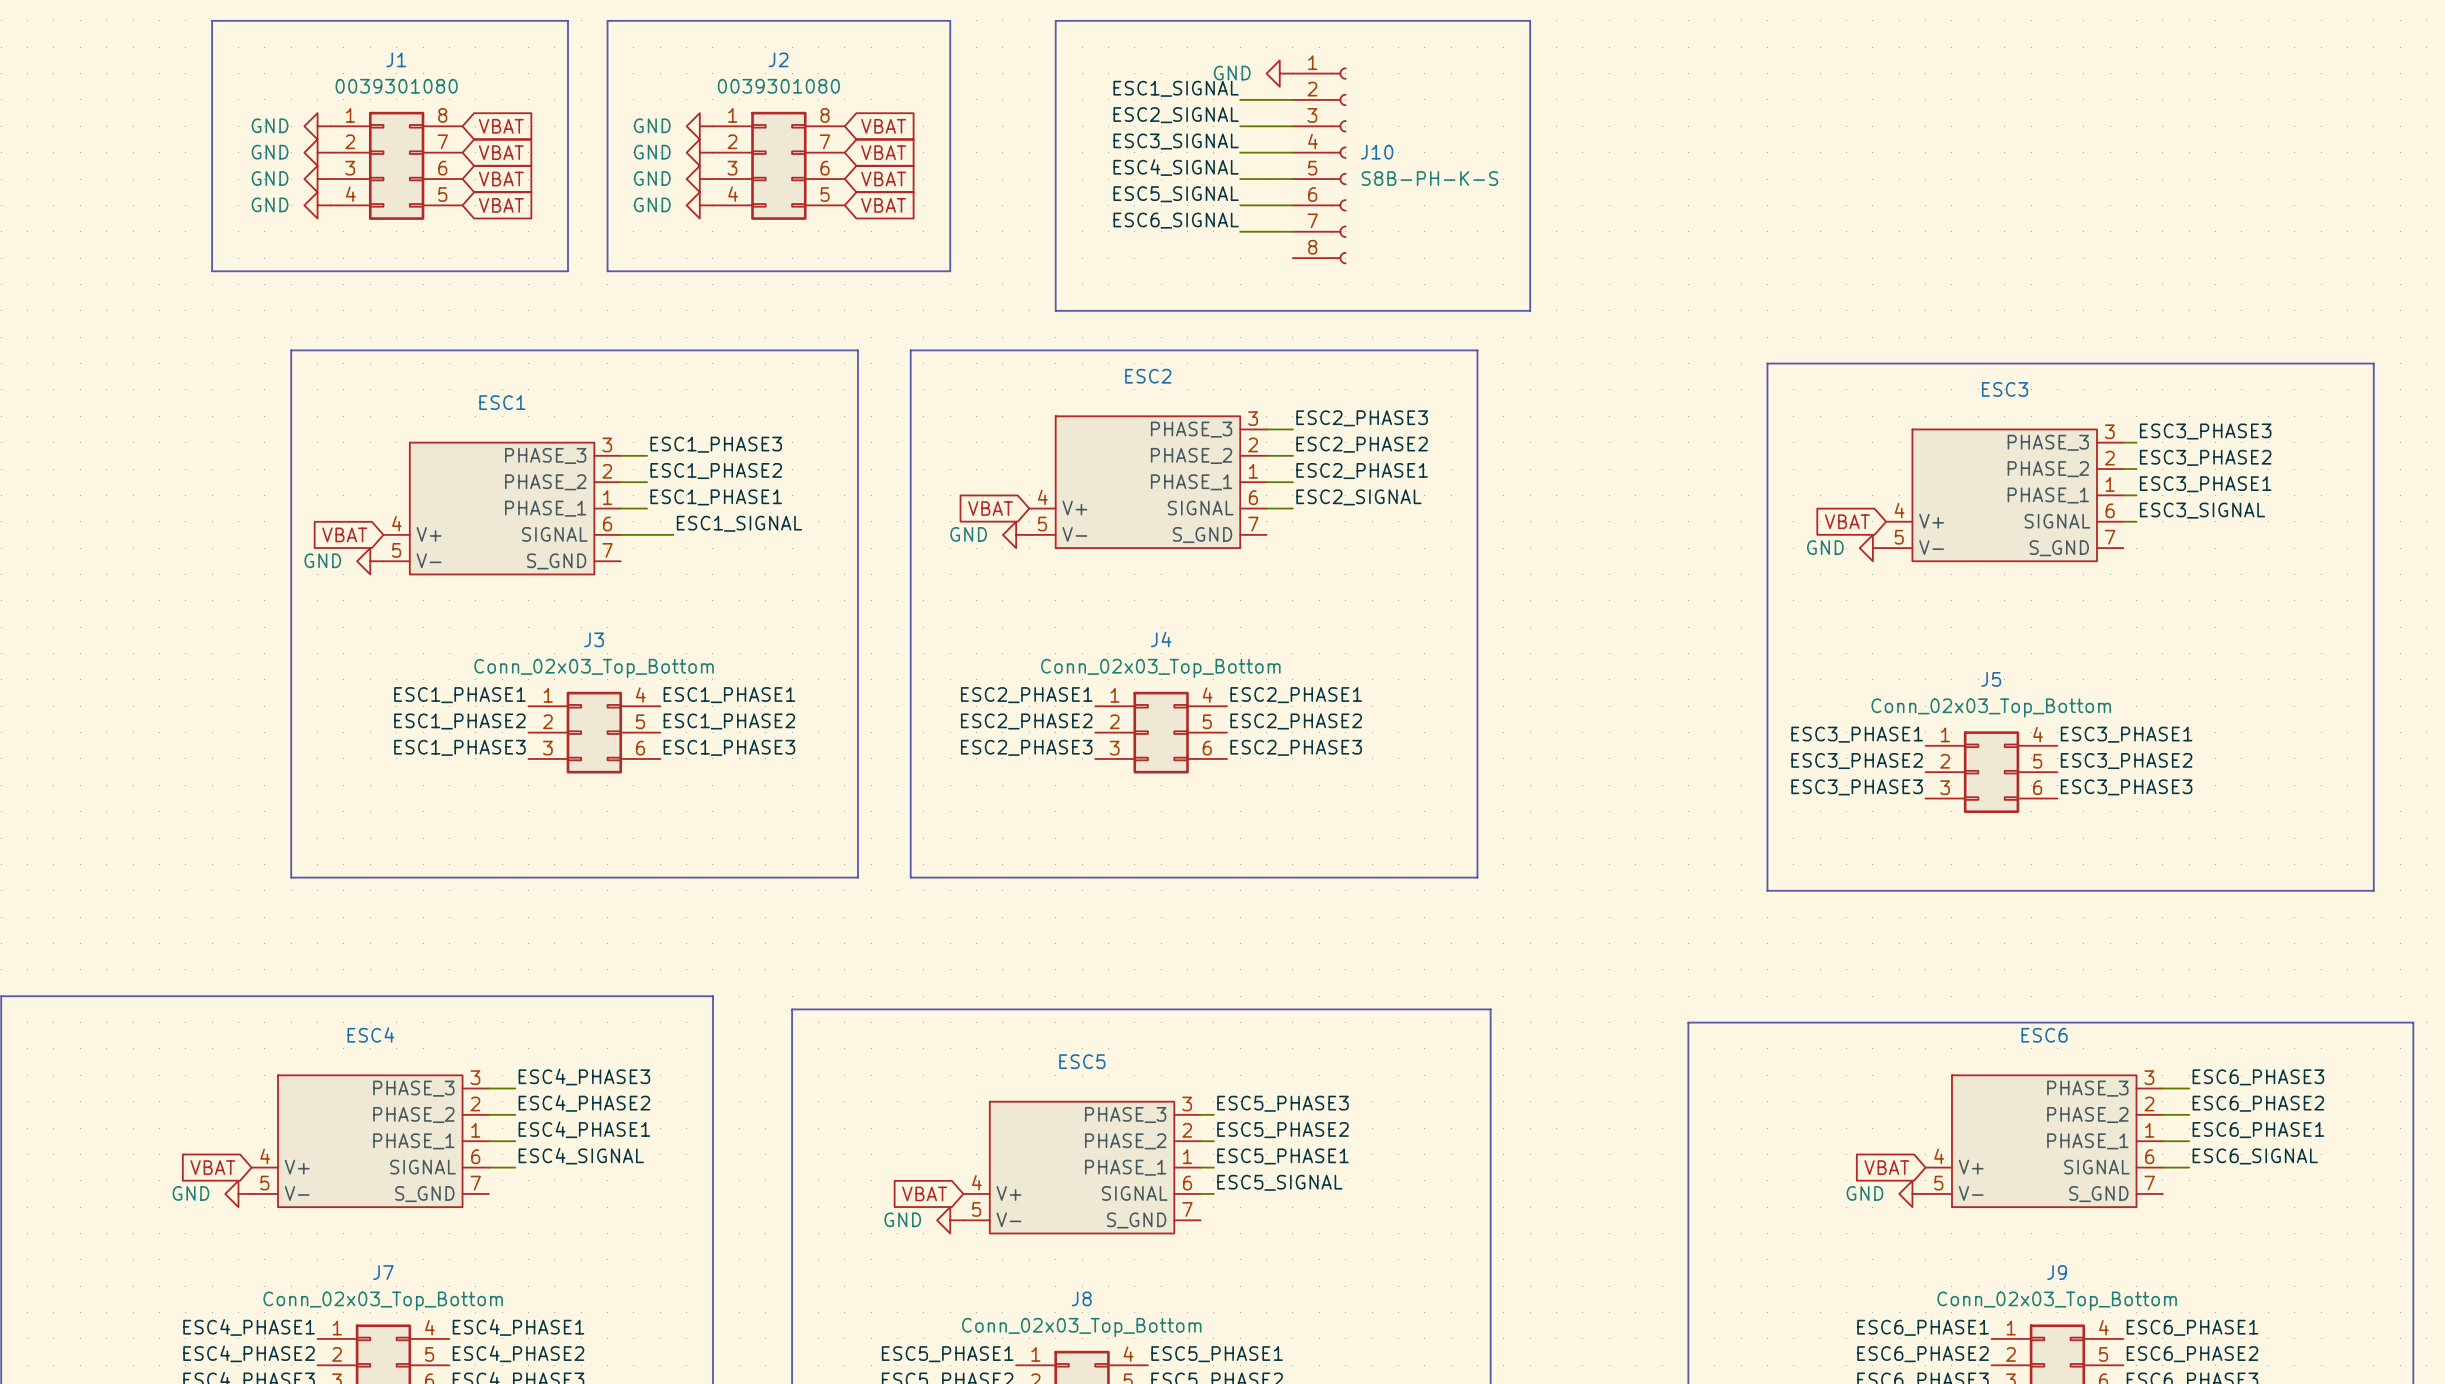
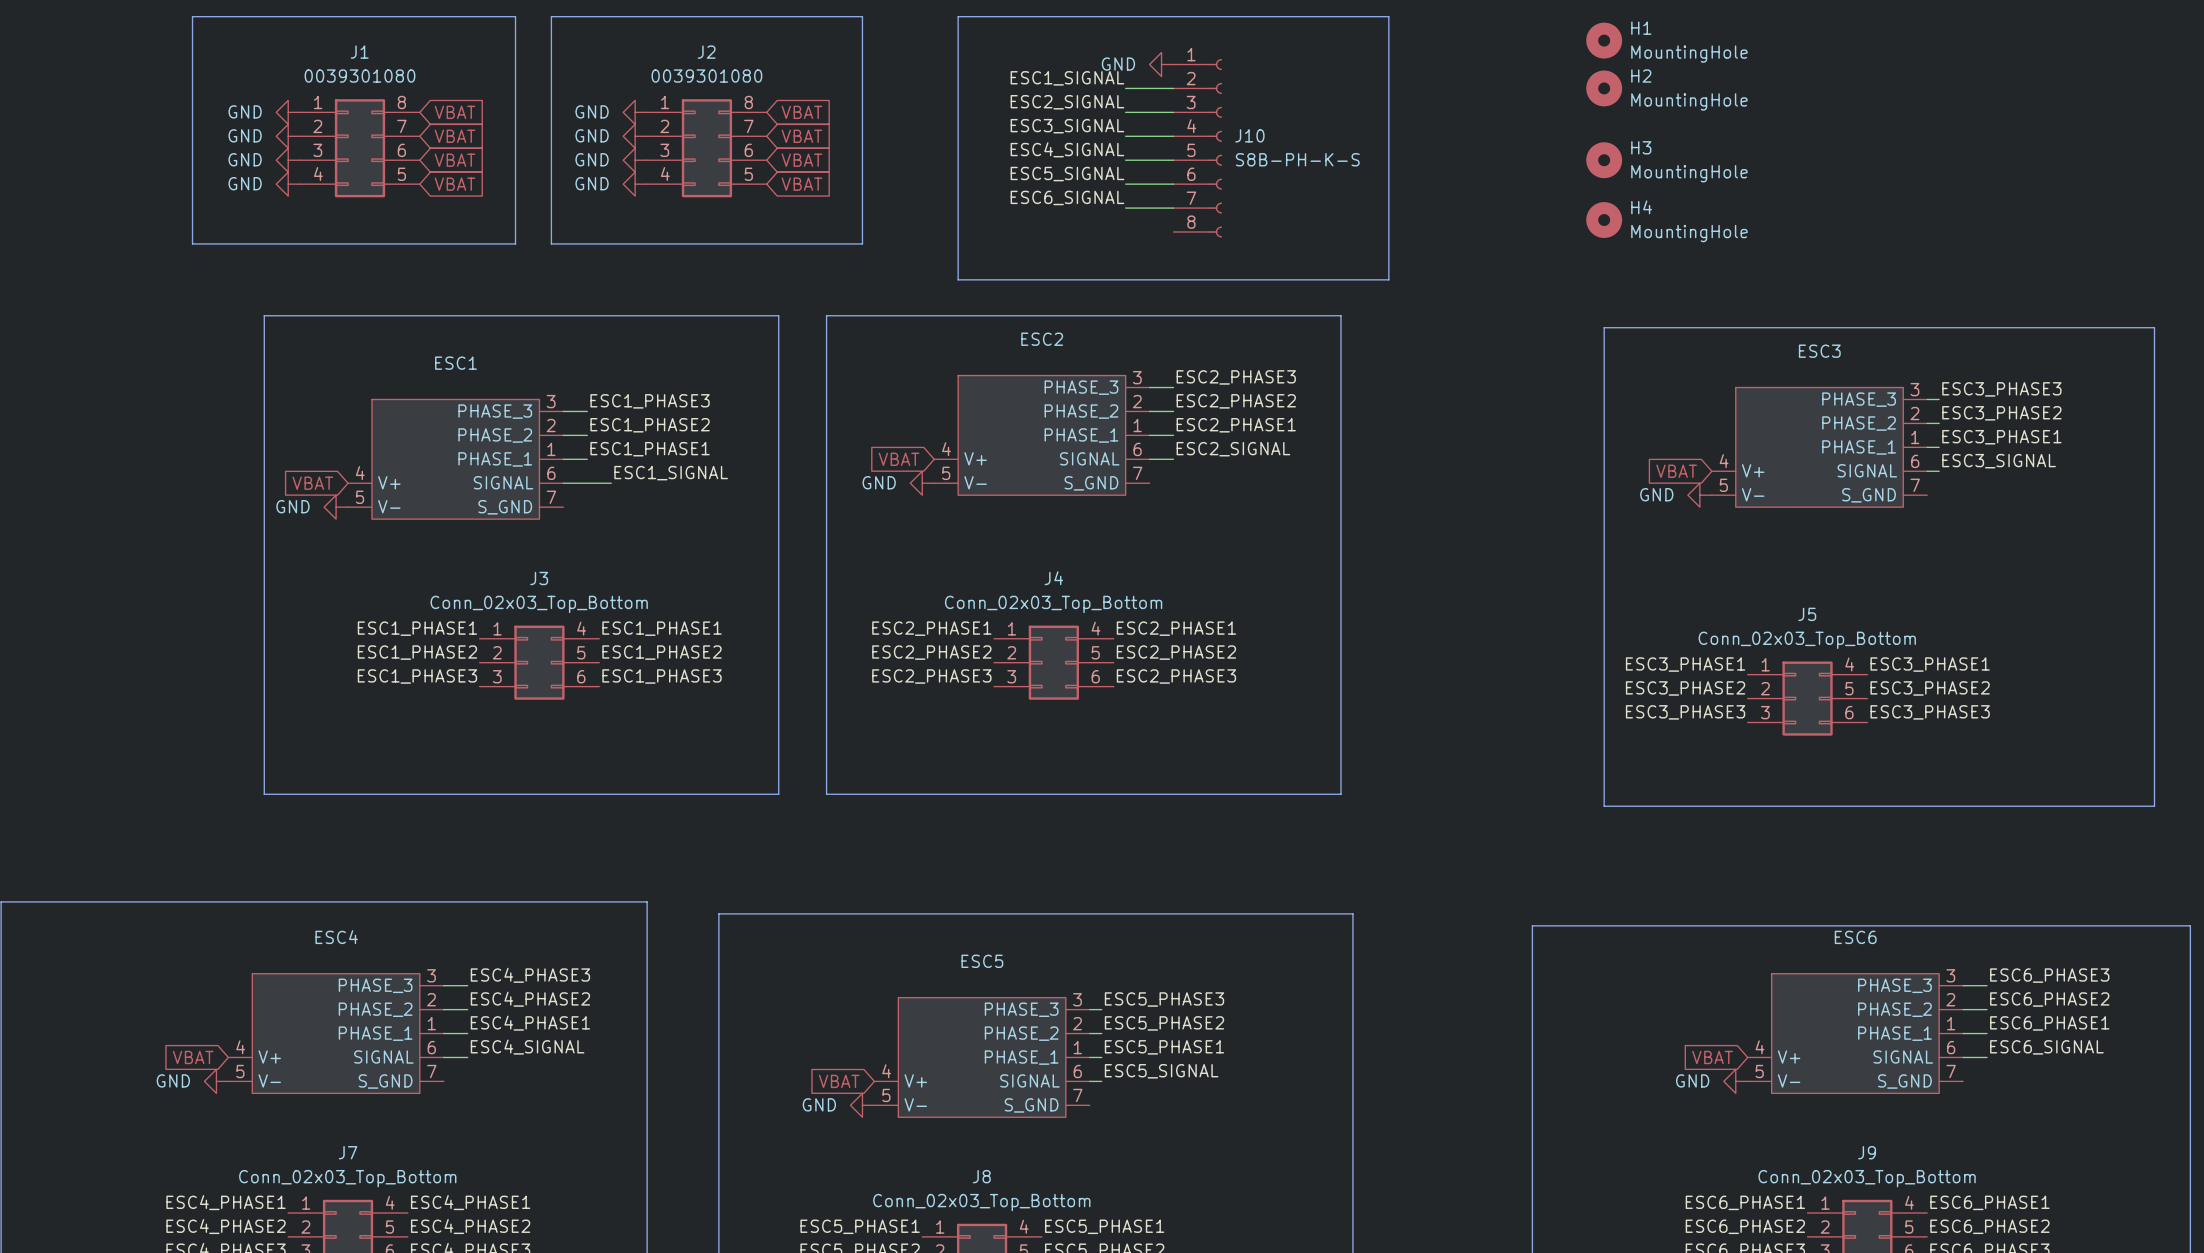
H1: none -> MountingHole (1604, 40)
H2: none -> MountingHole (1604, 88)
H3: none -> MountingHole (1604, 160)
H4: none -> MountingHole (1604, 220)

